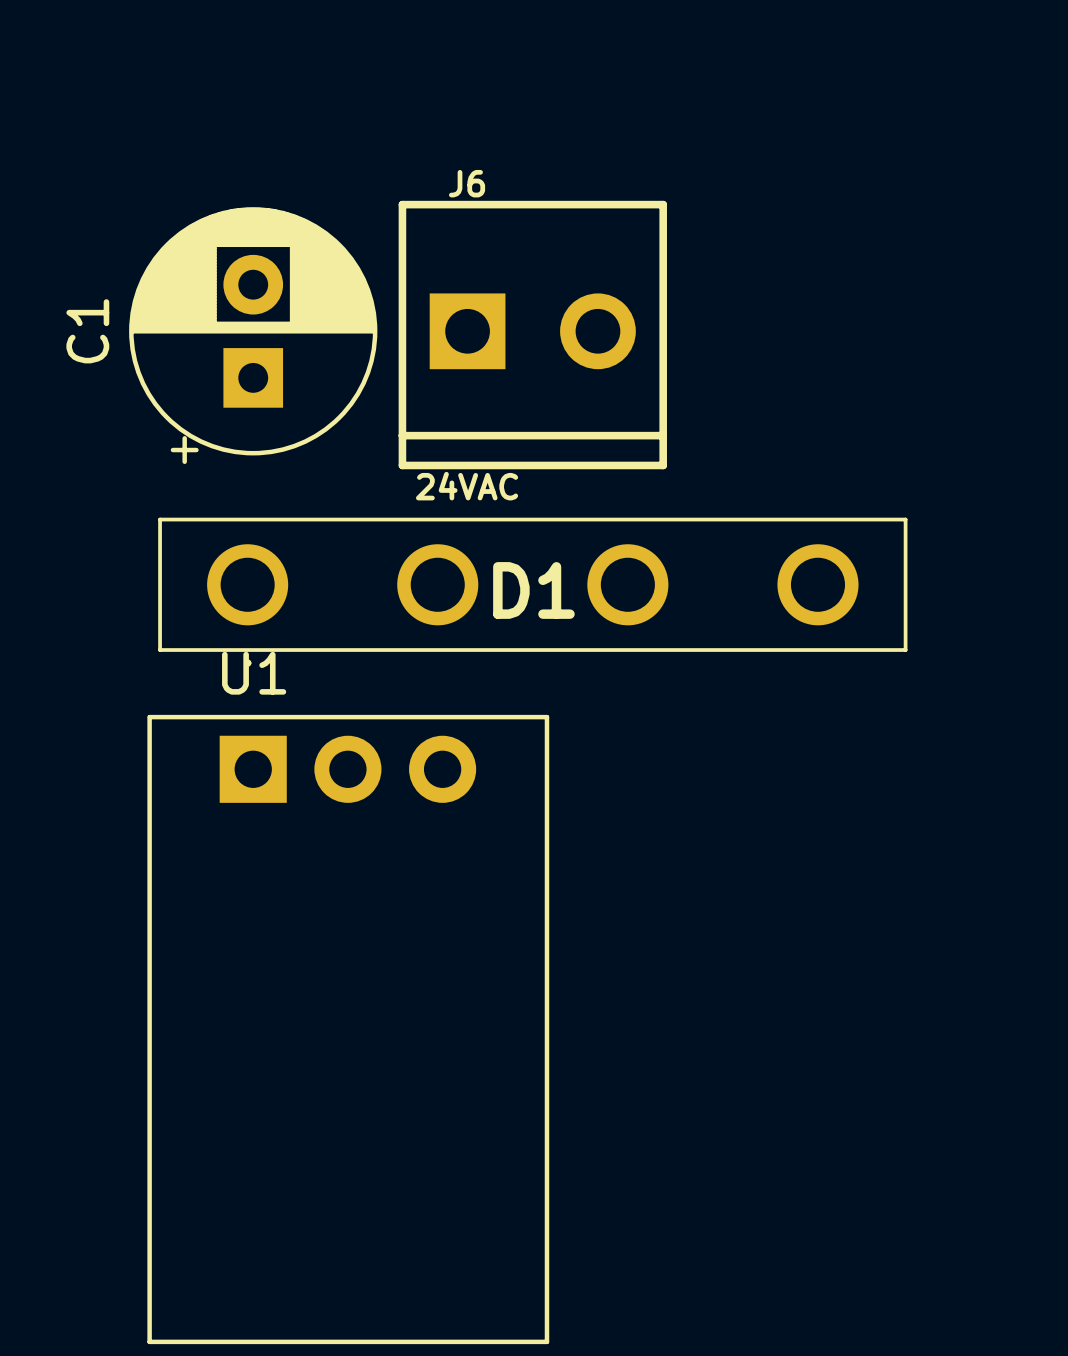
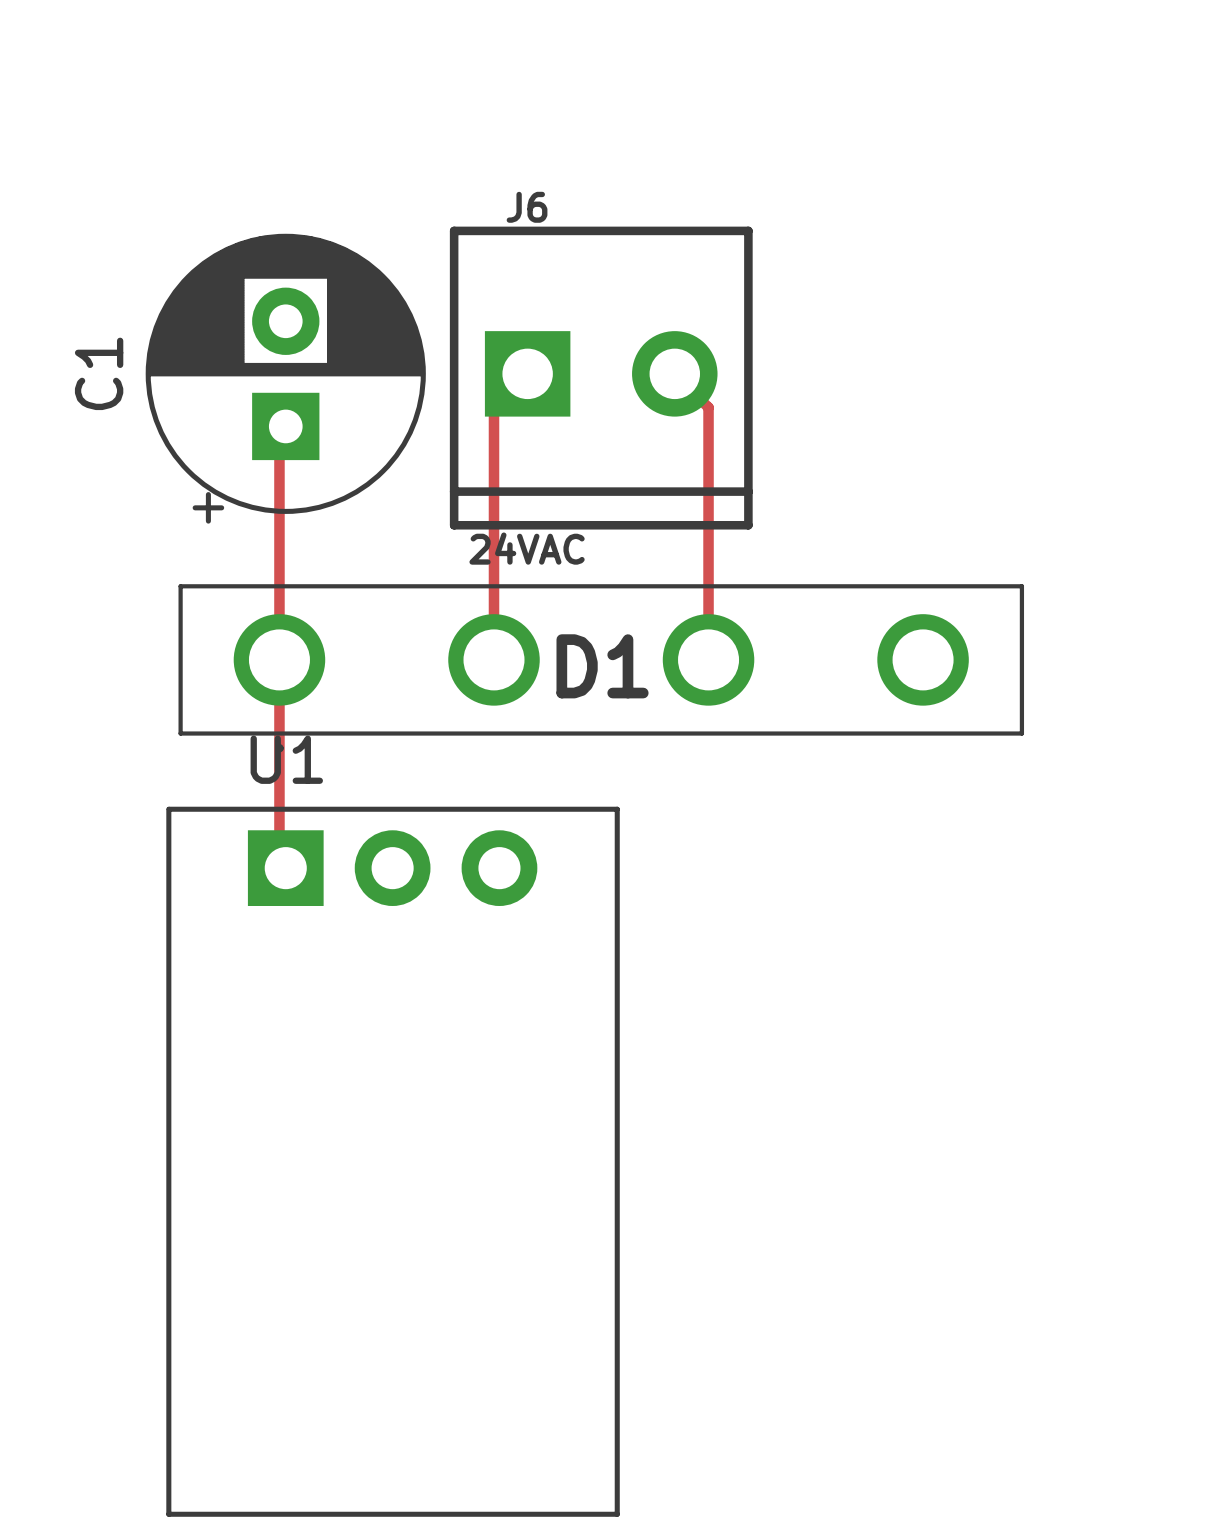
top track: none -> (527, 373) (494, 407) (494, 659)
top track: none -> (674, 373) (708, 407) (708, 659)
top track: none -> (285, 426) (279, 432) (279, 861) (285, 868)

